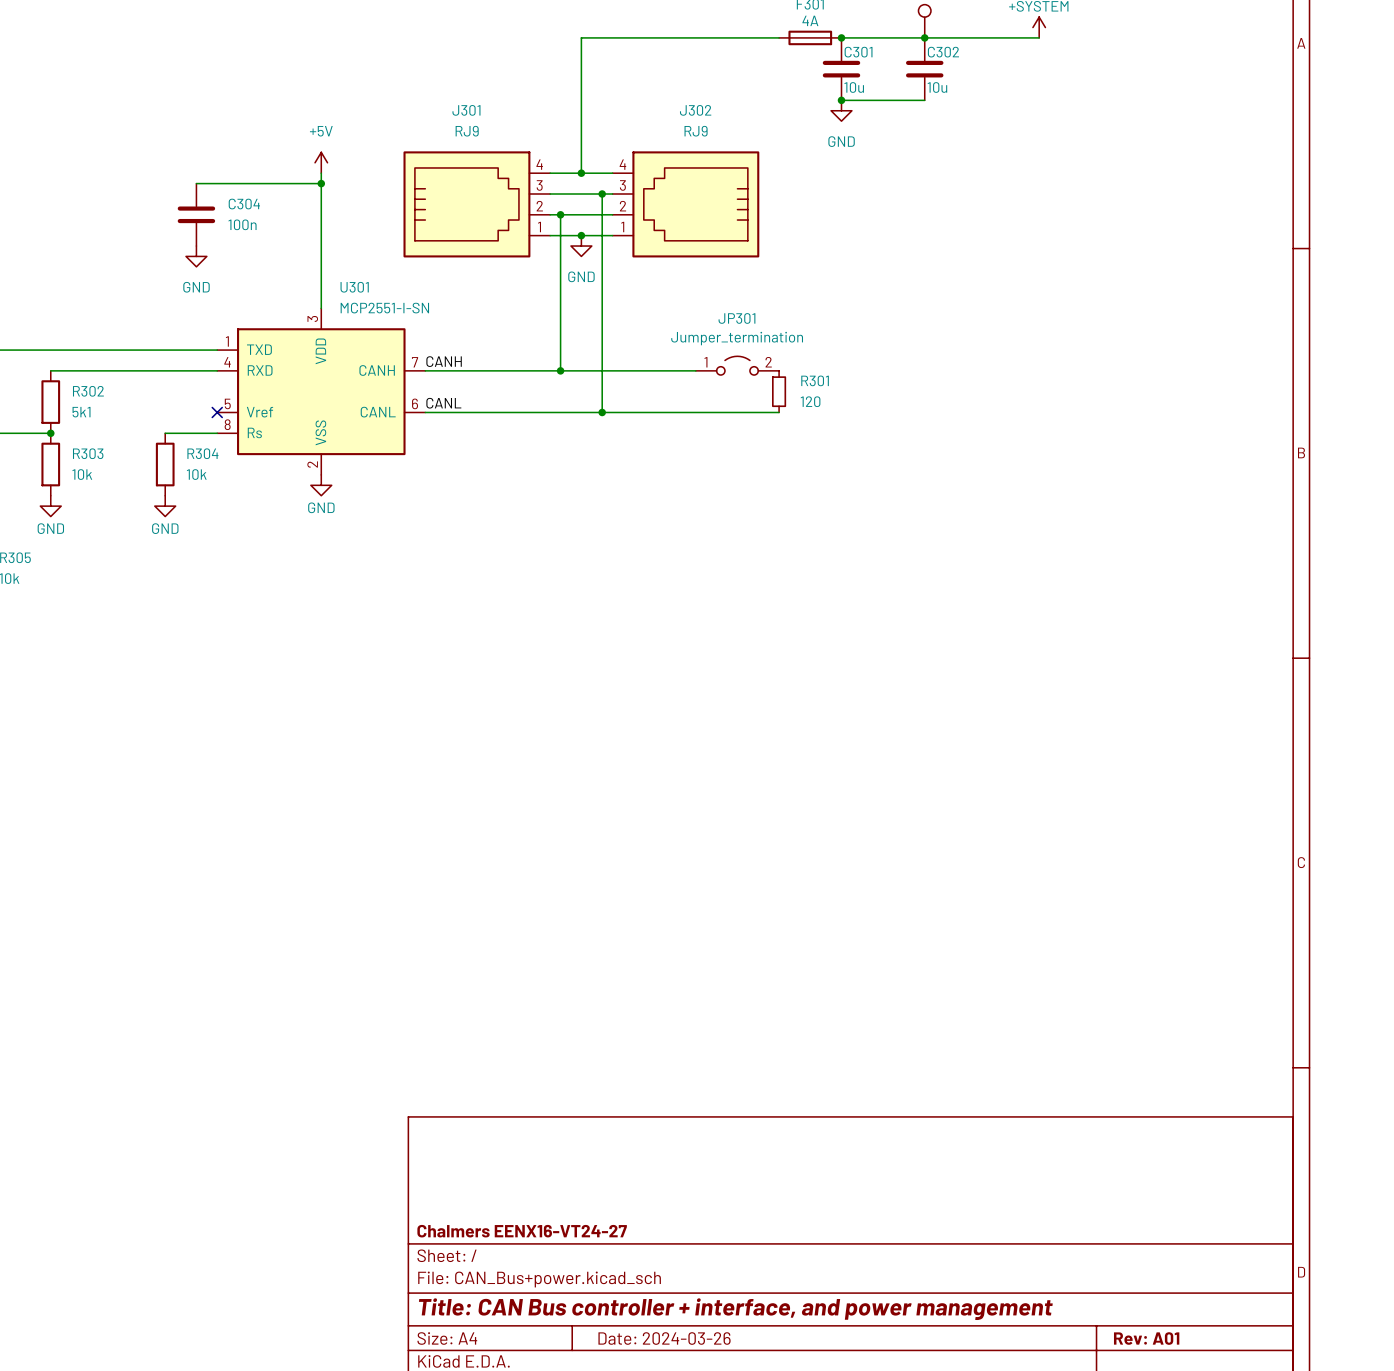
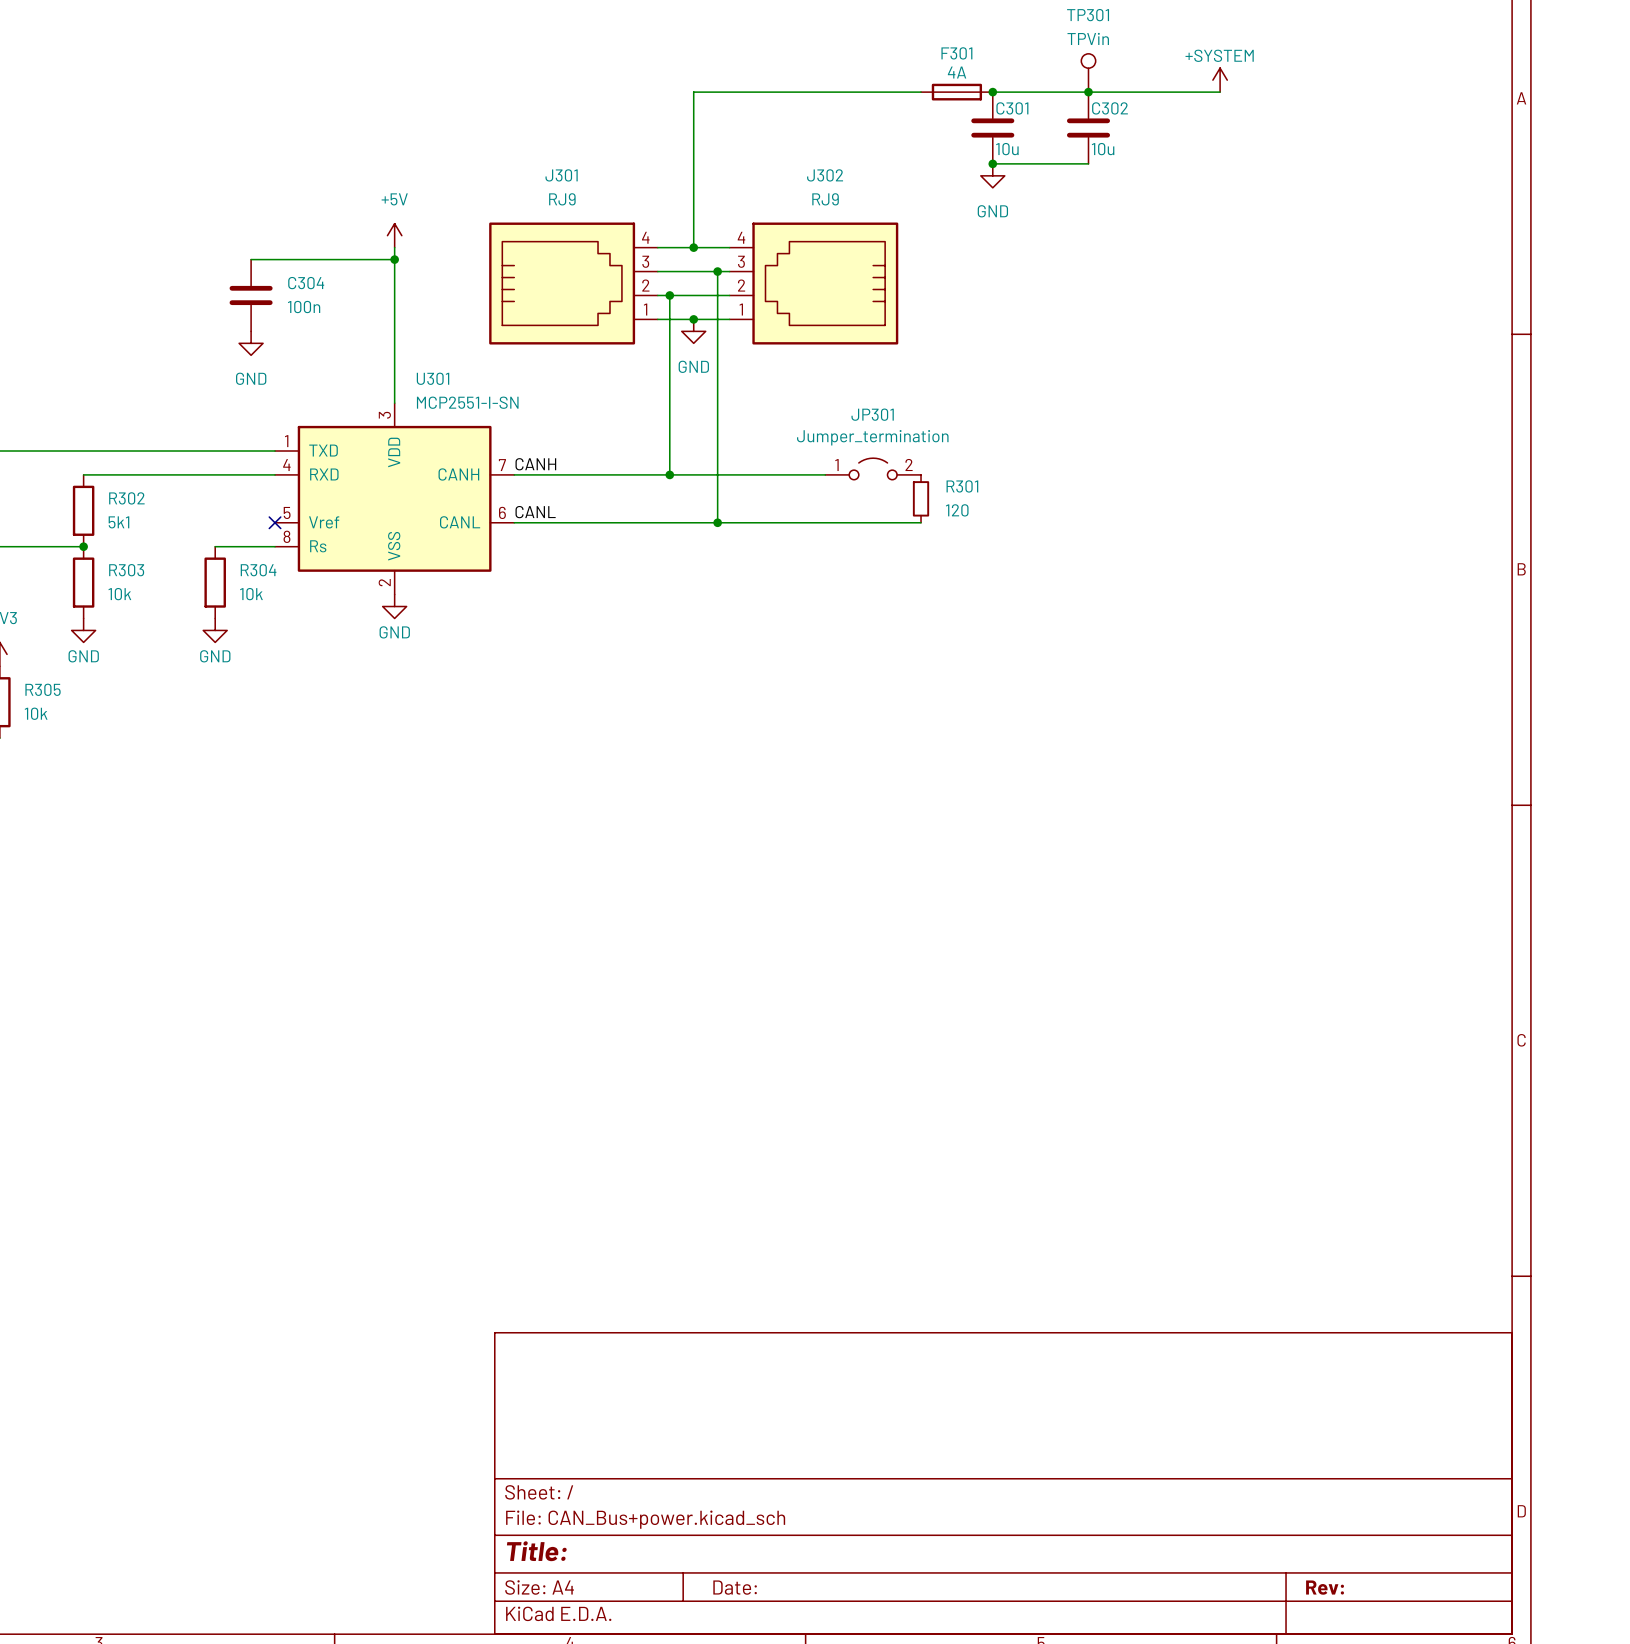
title block: Chalmers EENX16-VT24-27 (522, 1231) -> none
title block: Title: CAN Bus controller + interface, and power management (735, 1309) -> Title: (536, 1551)
title block: Date: 2024-03-26 (664, 1338) -> Date: (735, 1587)
title block: Rev: A01 (1146, 1338) -> Rev: (1325, 1587)

